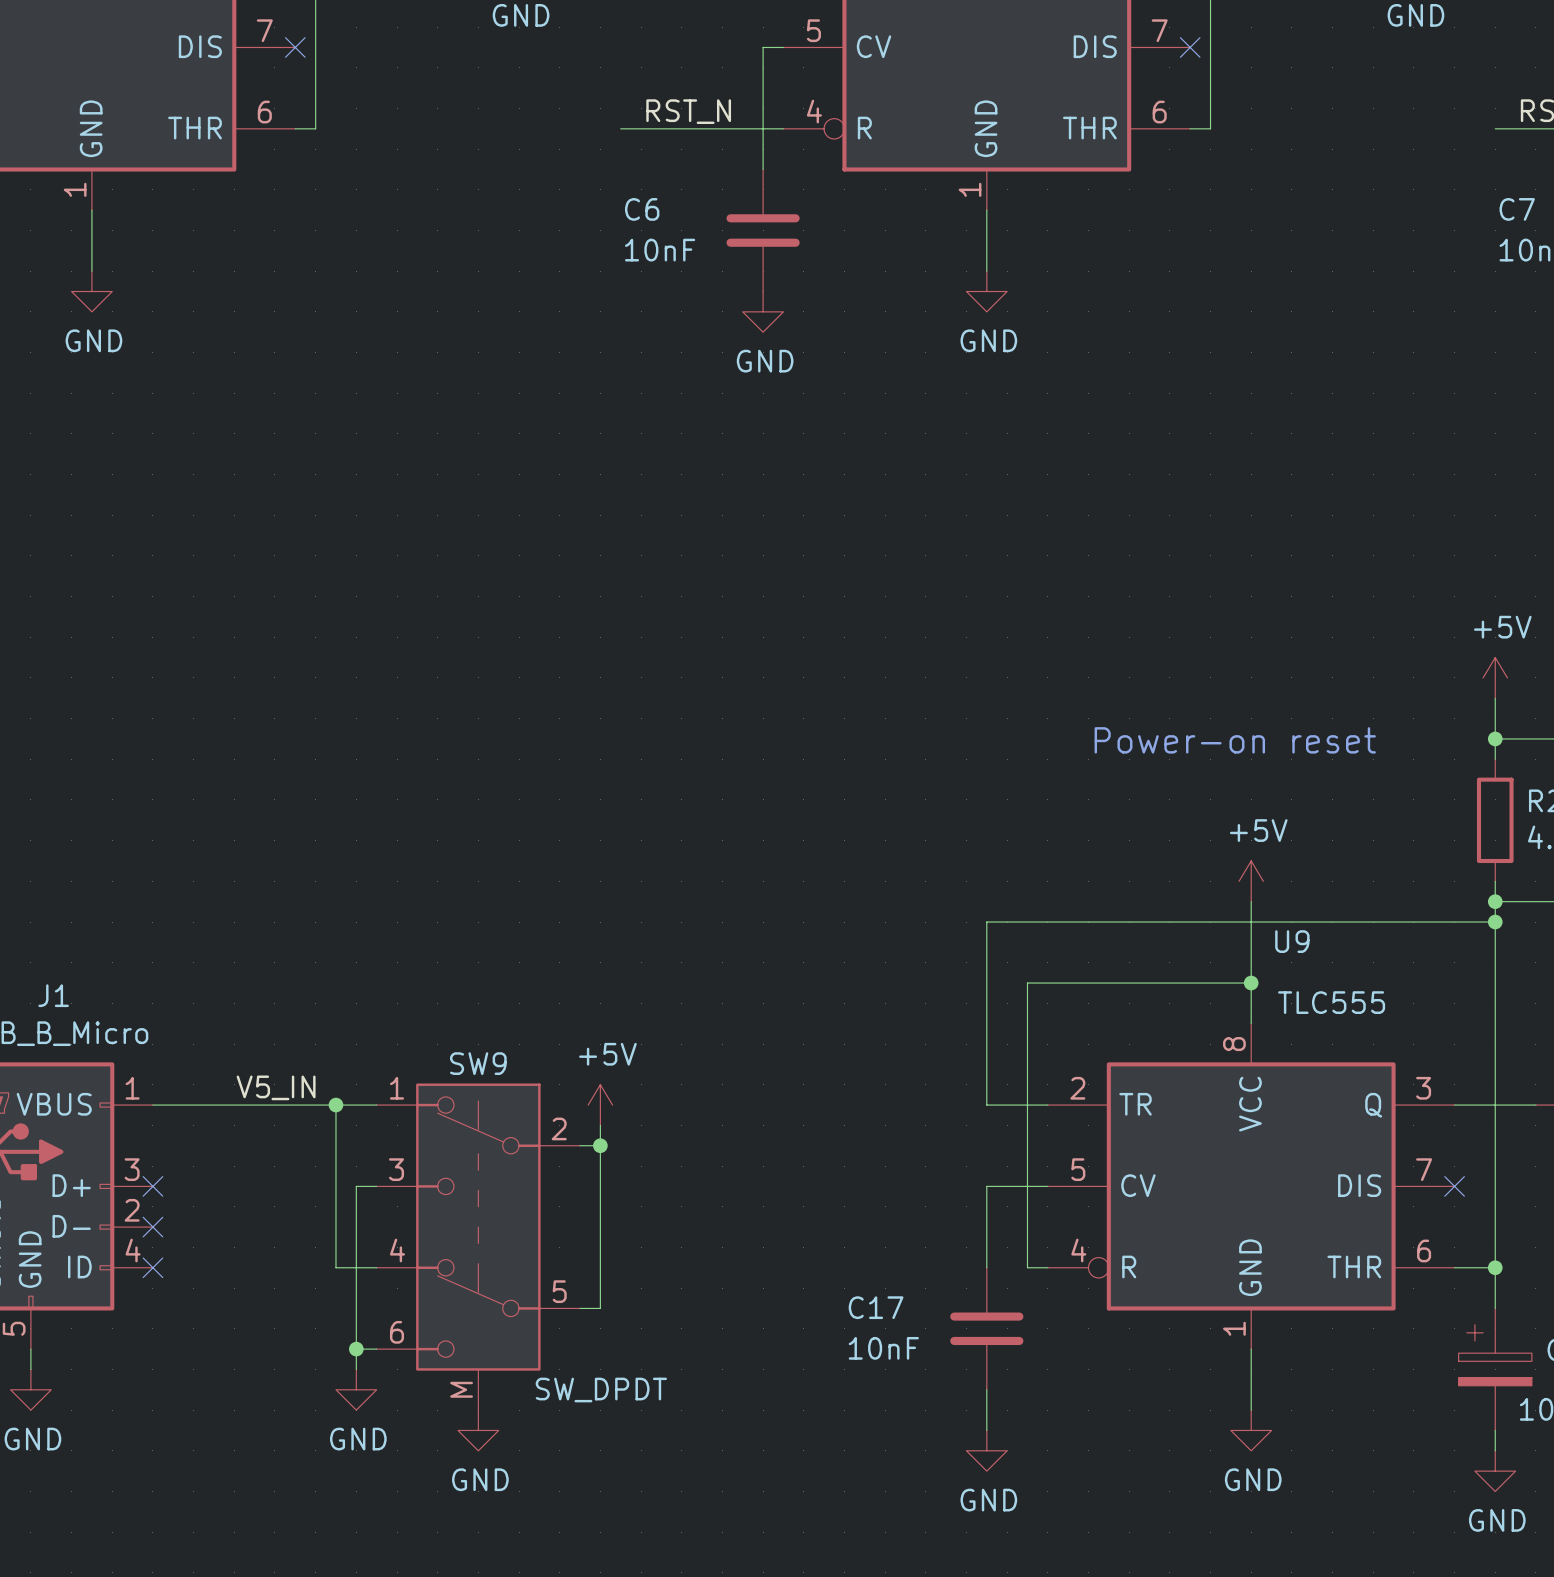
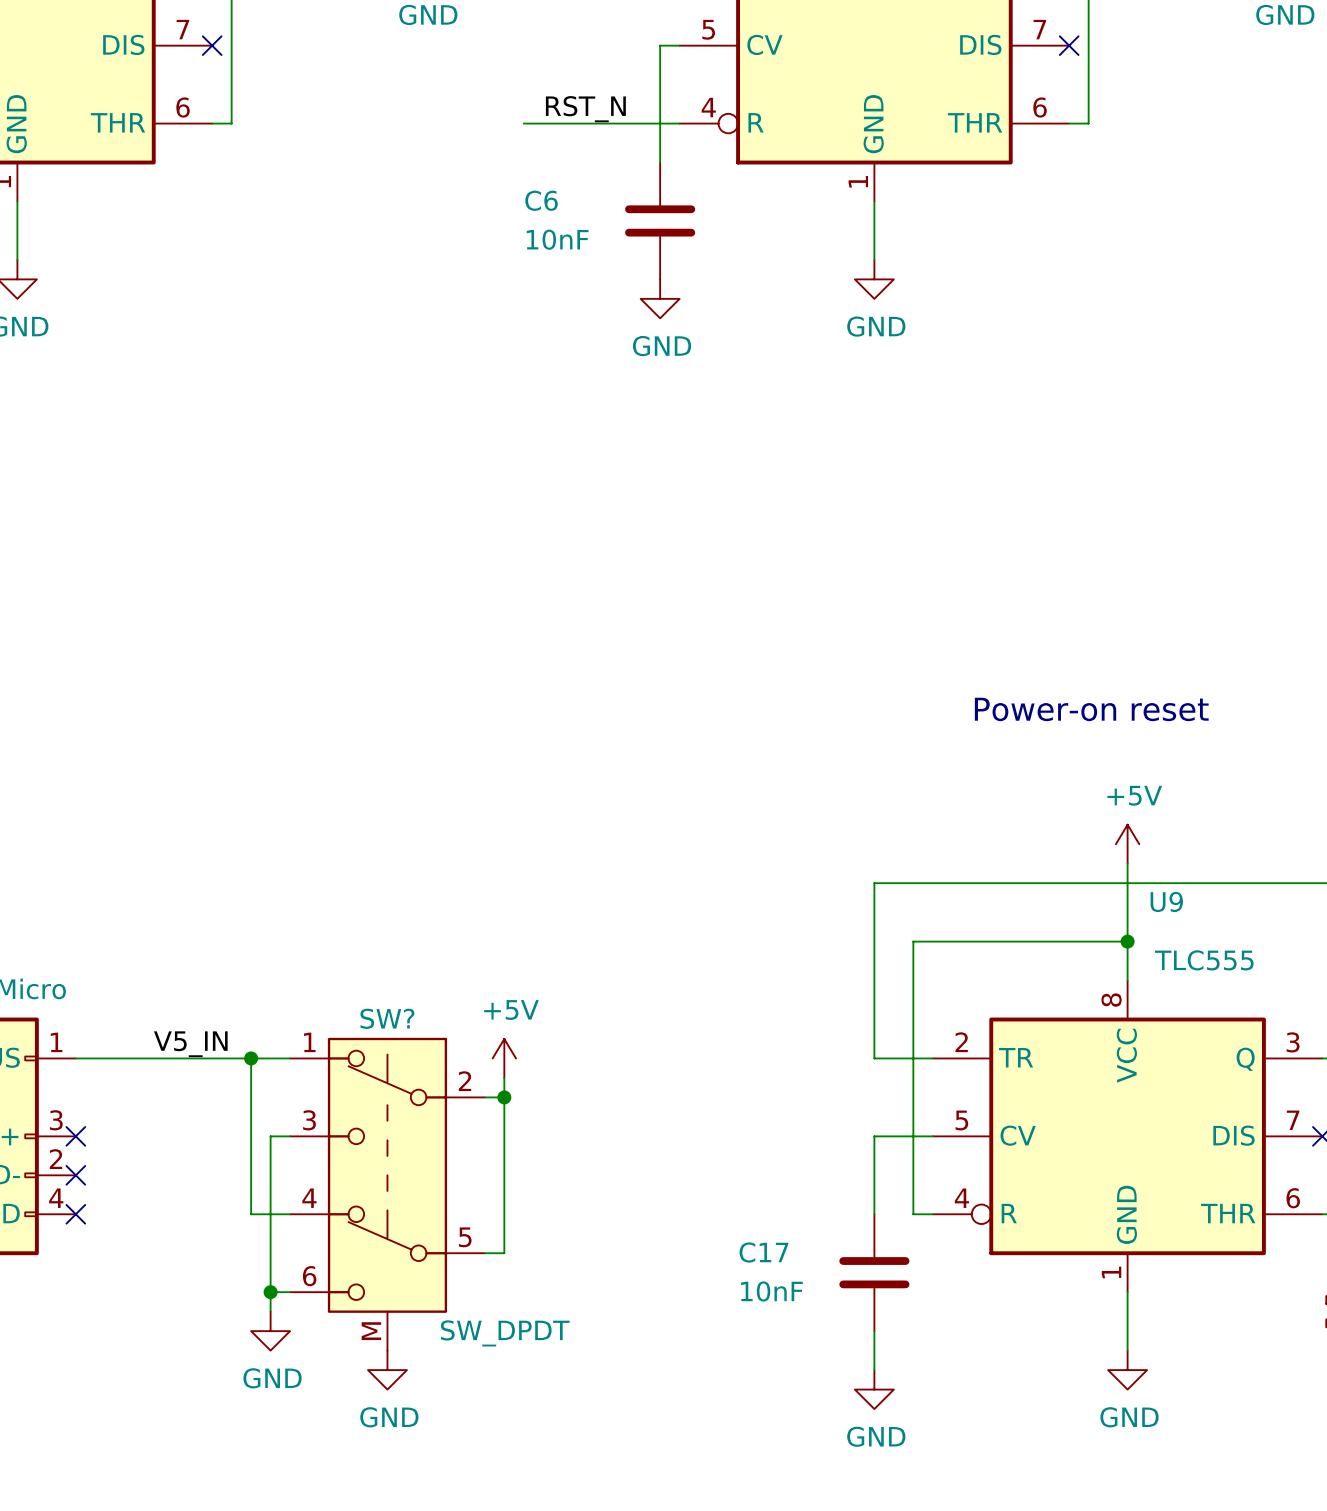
SW9 name: SW9 (478, 1063) -> SW? (387, 1018)

